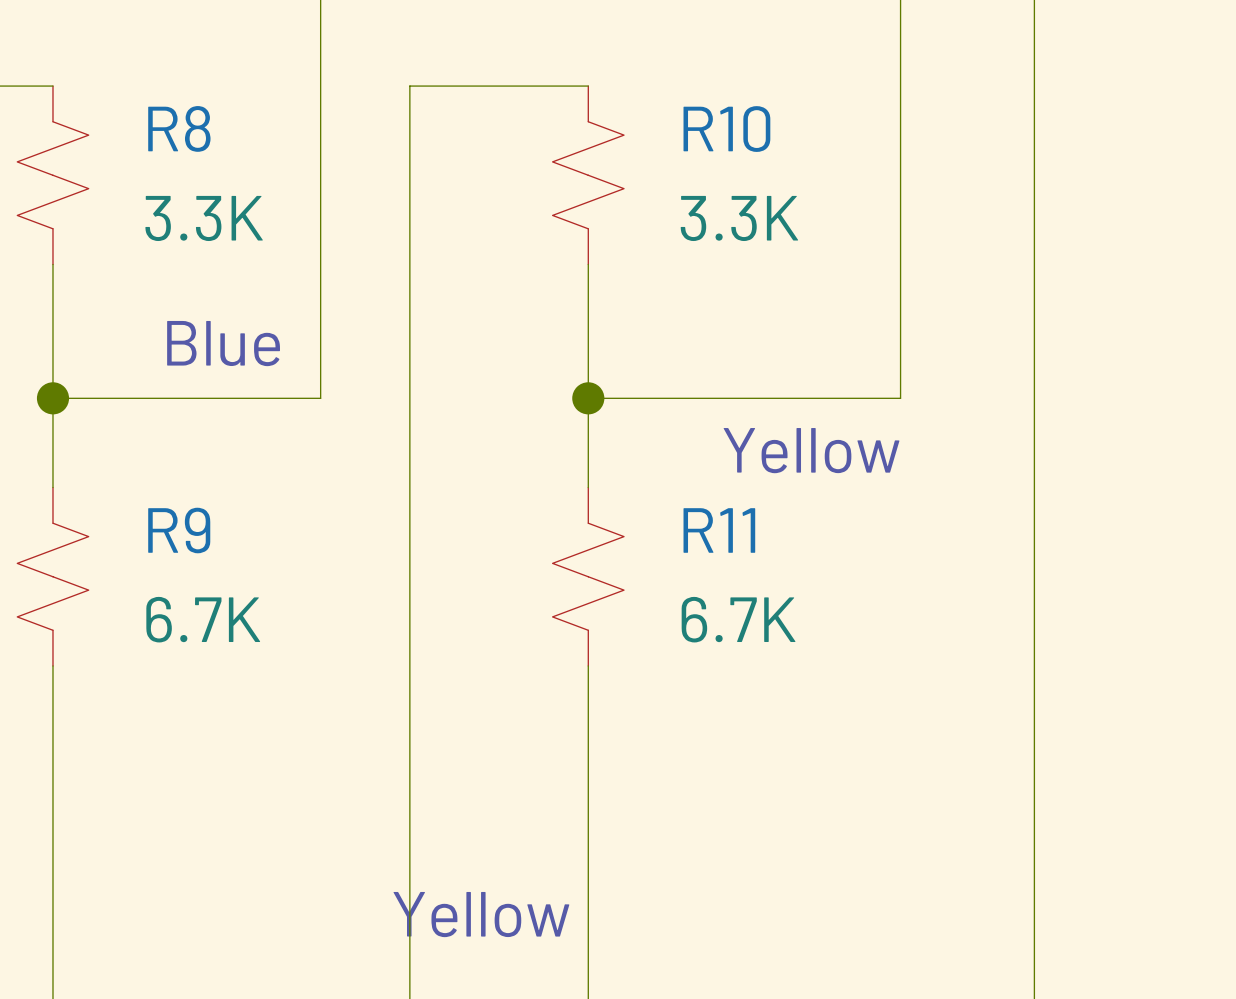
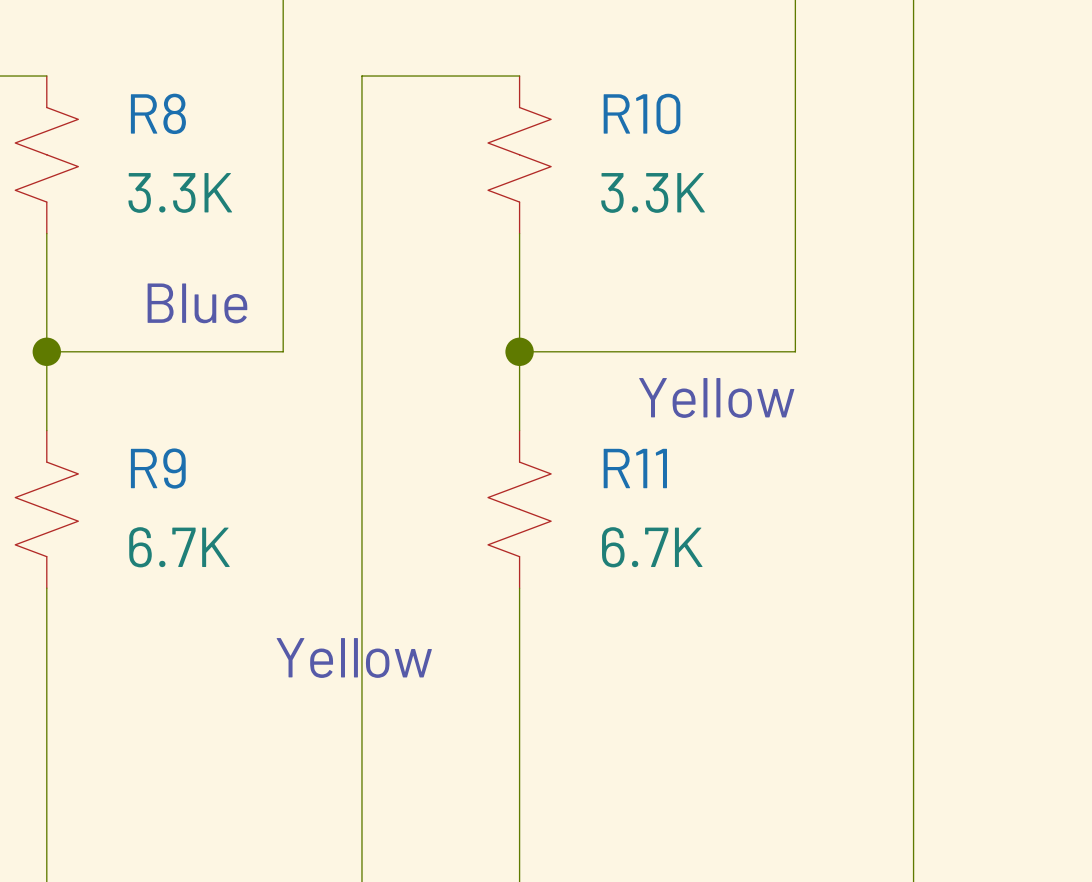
text position: Yellow (481, 914) -> Yellow (354, 658)

